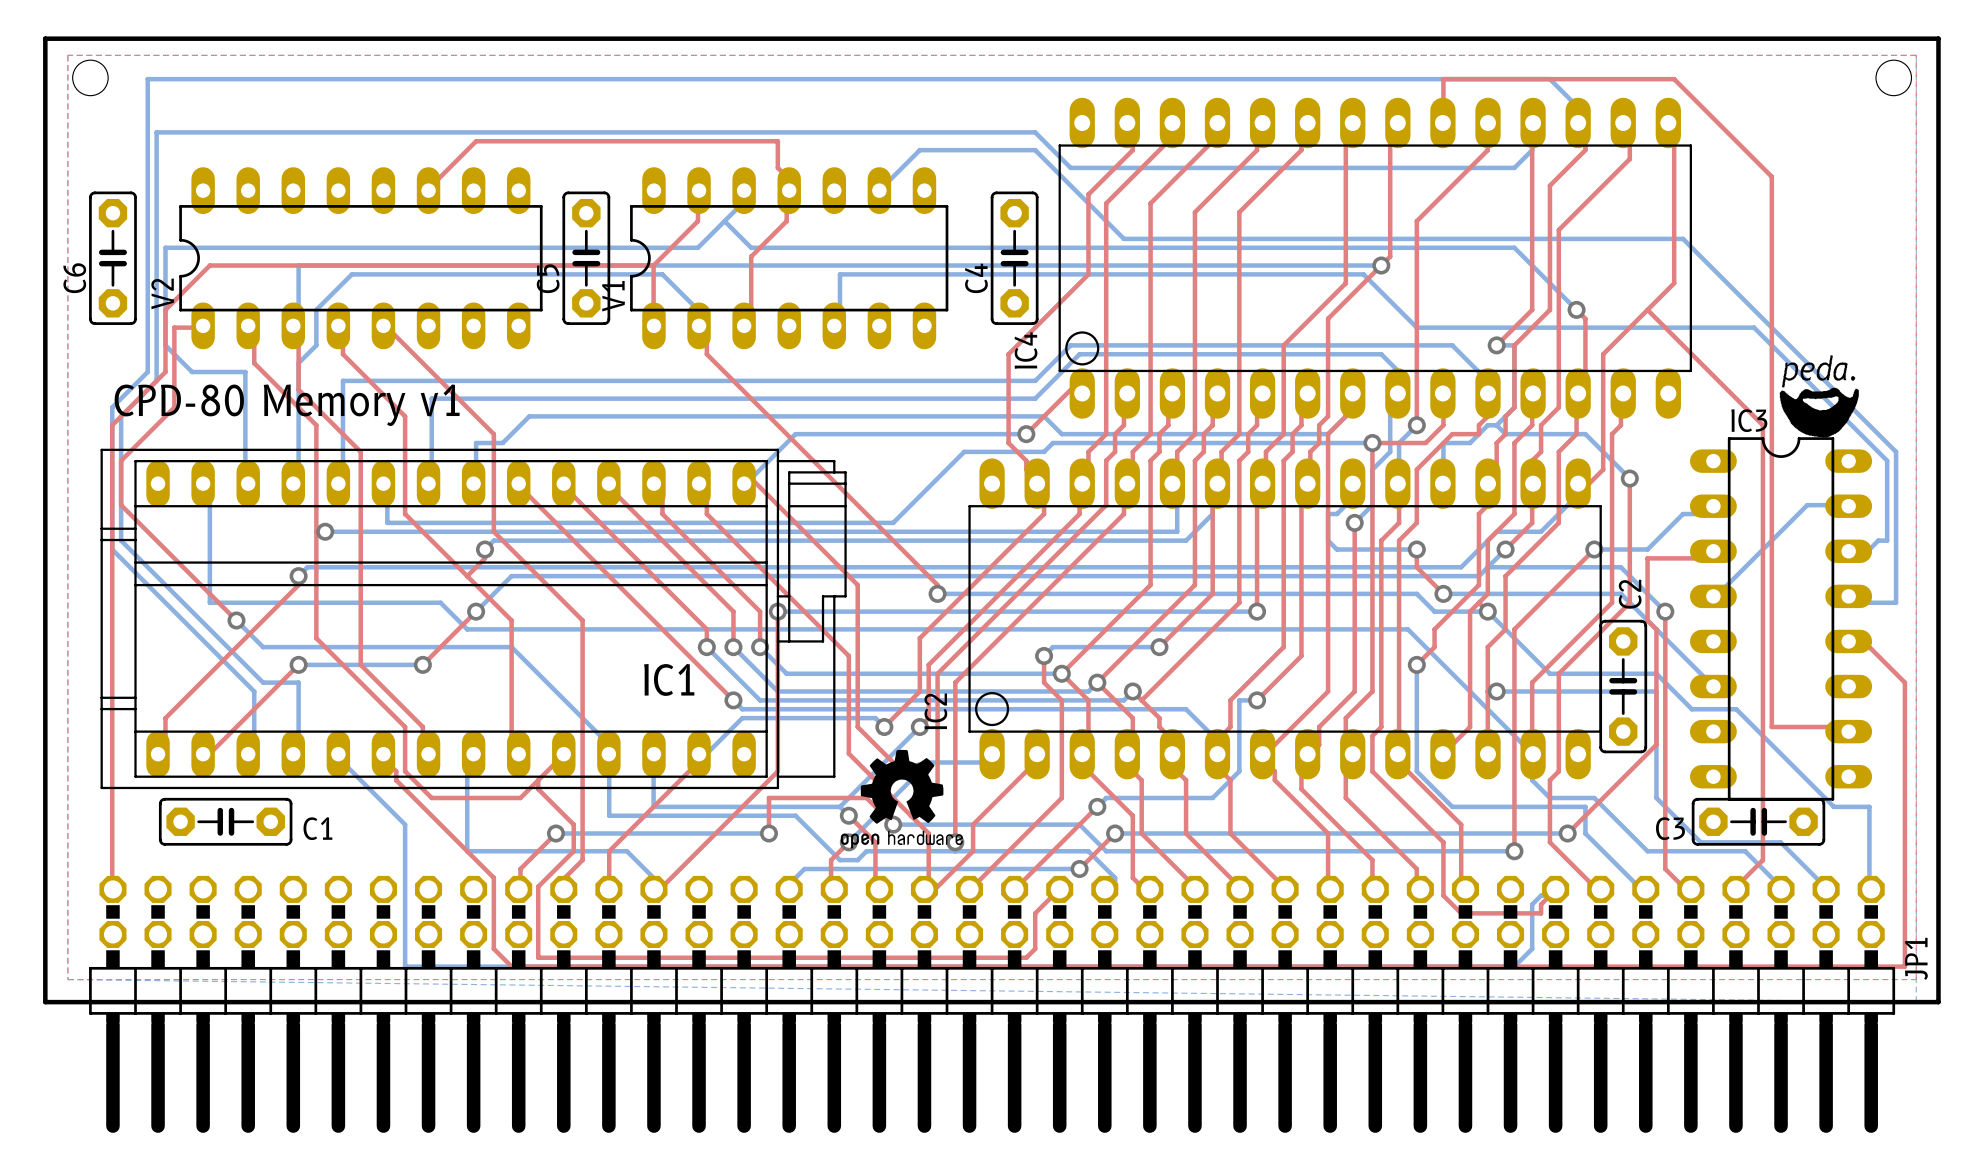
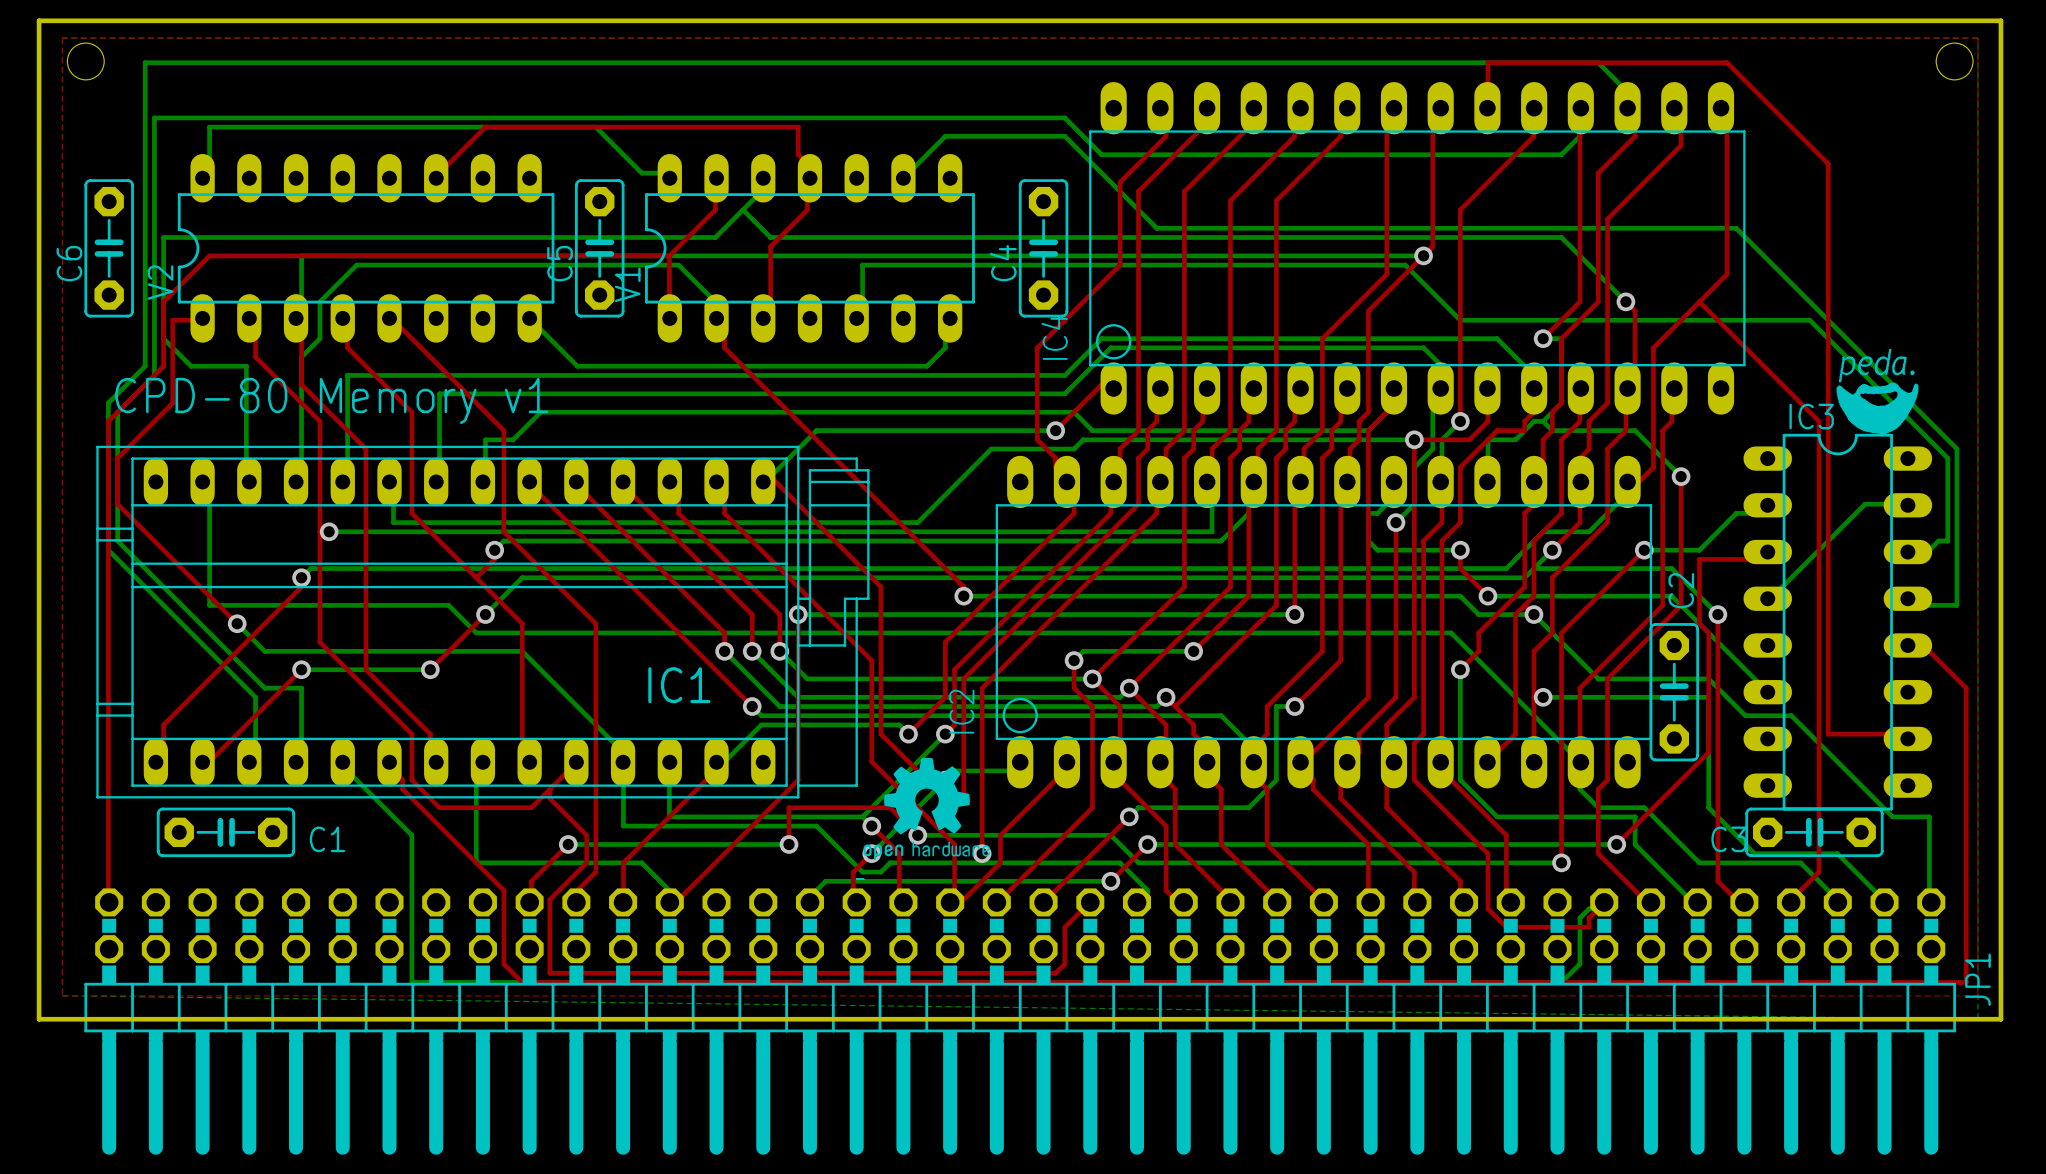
bottom track: none -> (202, 178) (209, 173) (209, 127) (595, 127) (641, 173) (669, 173) (669, 178)
bottom track: none -> (529, 318) (577, 366) (926, 366) (945, 347) (945, 320) (950, 318)

